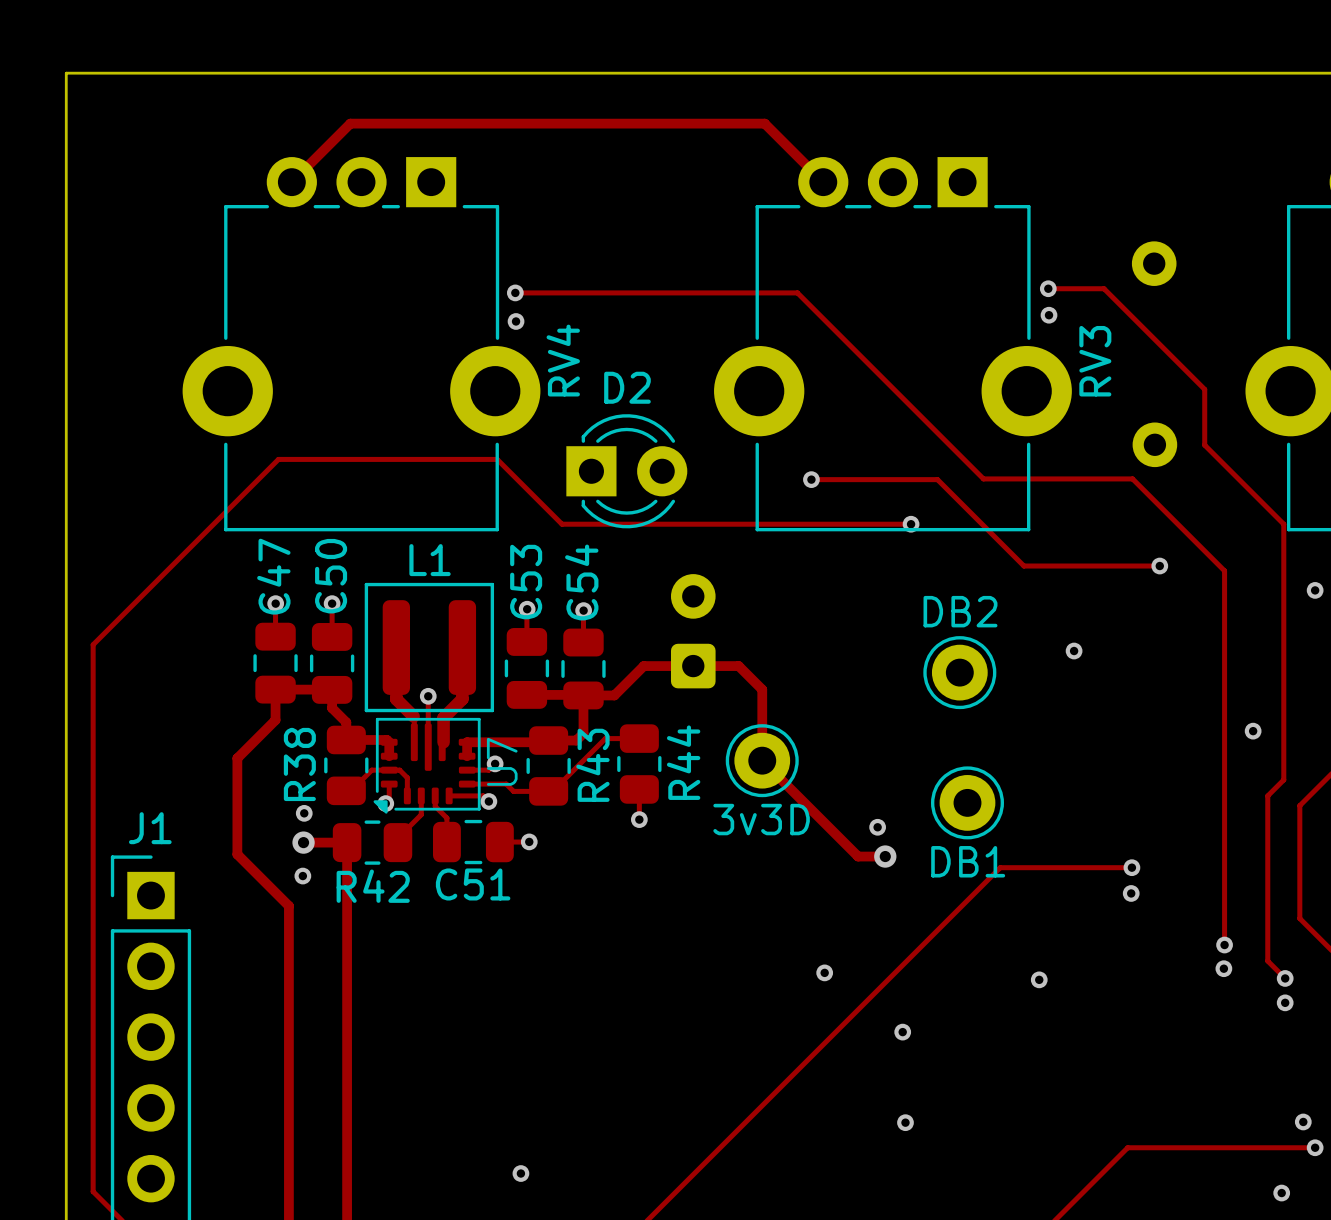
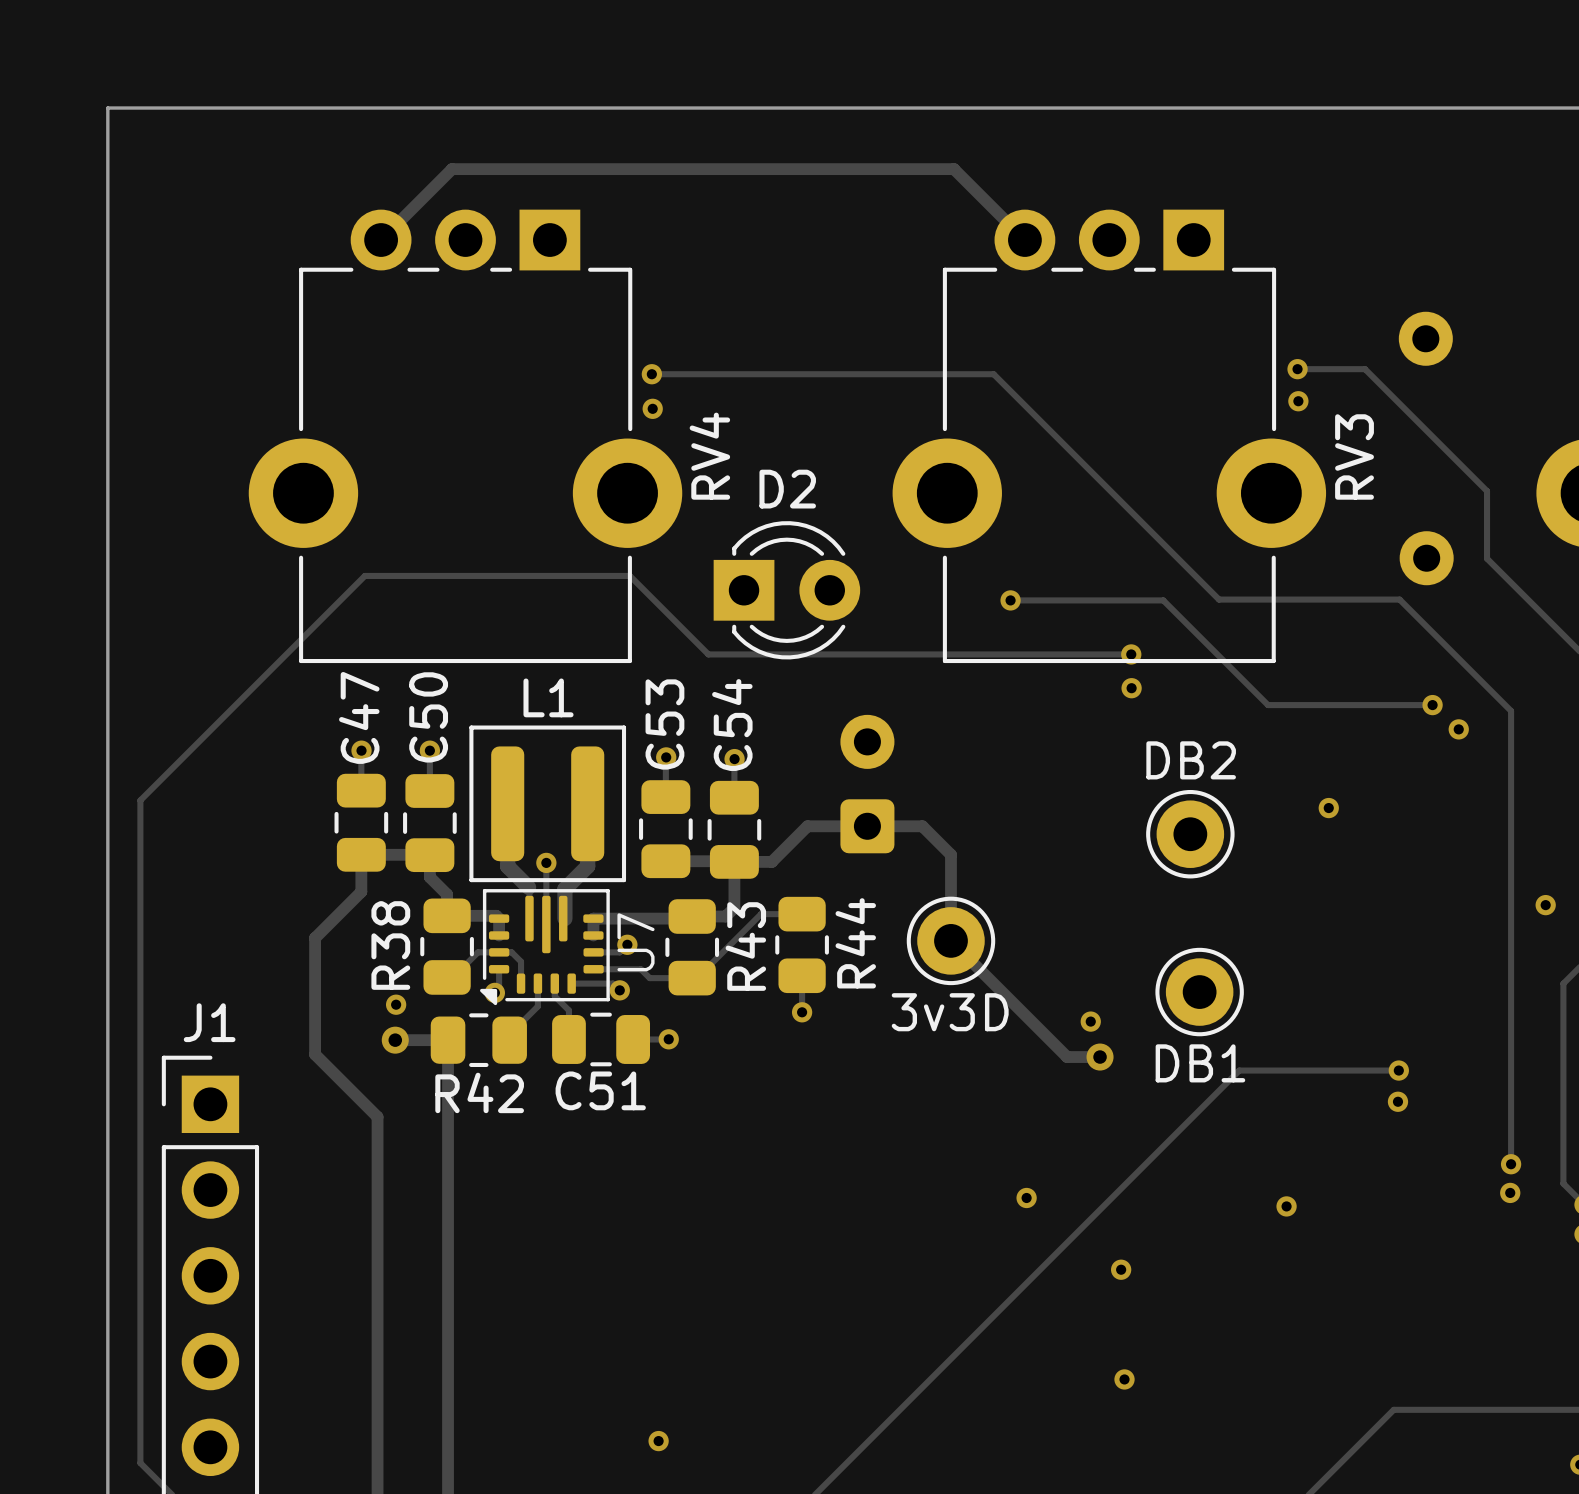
via: none -> (1131, 688)
via: none -> (1458, 729)
via: (302, 876) -> none

